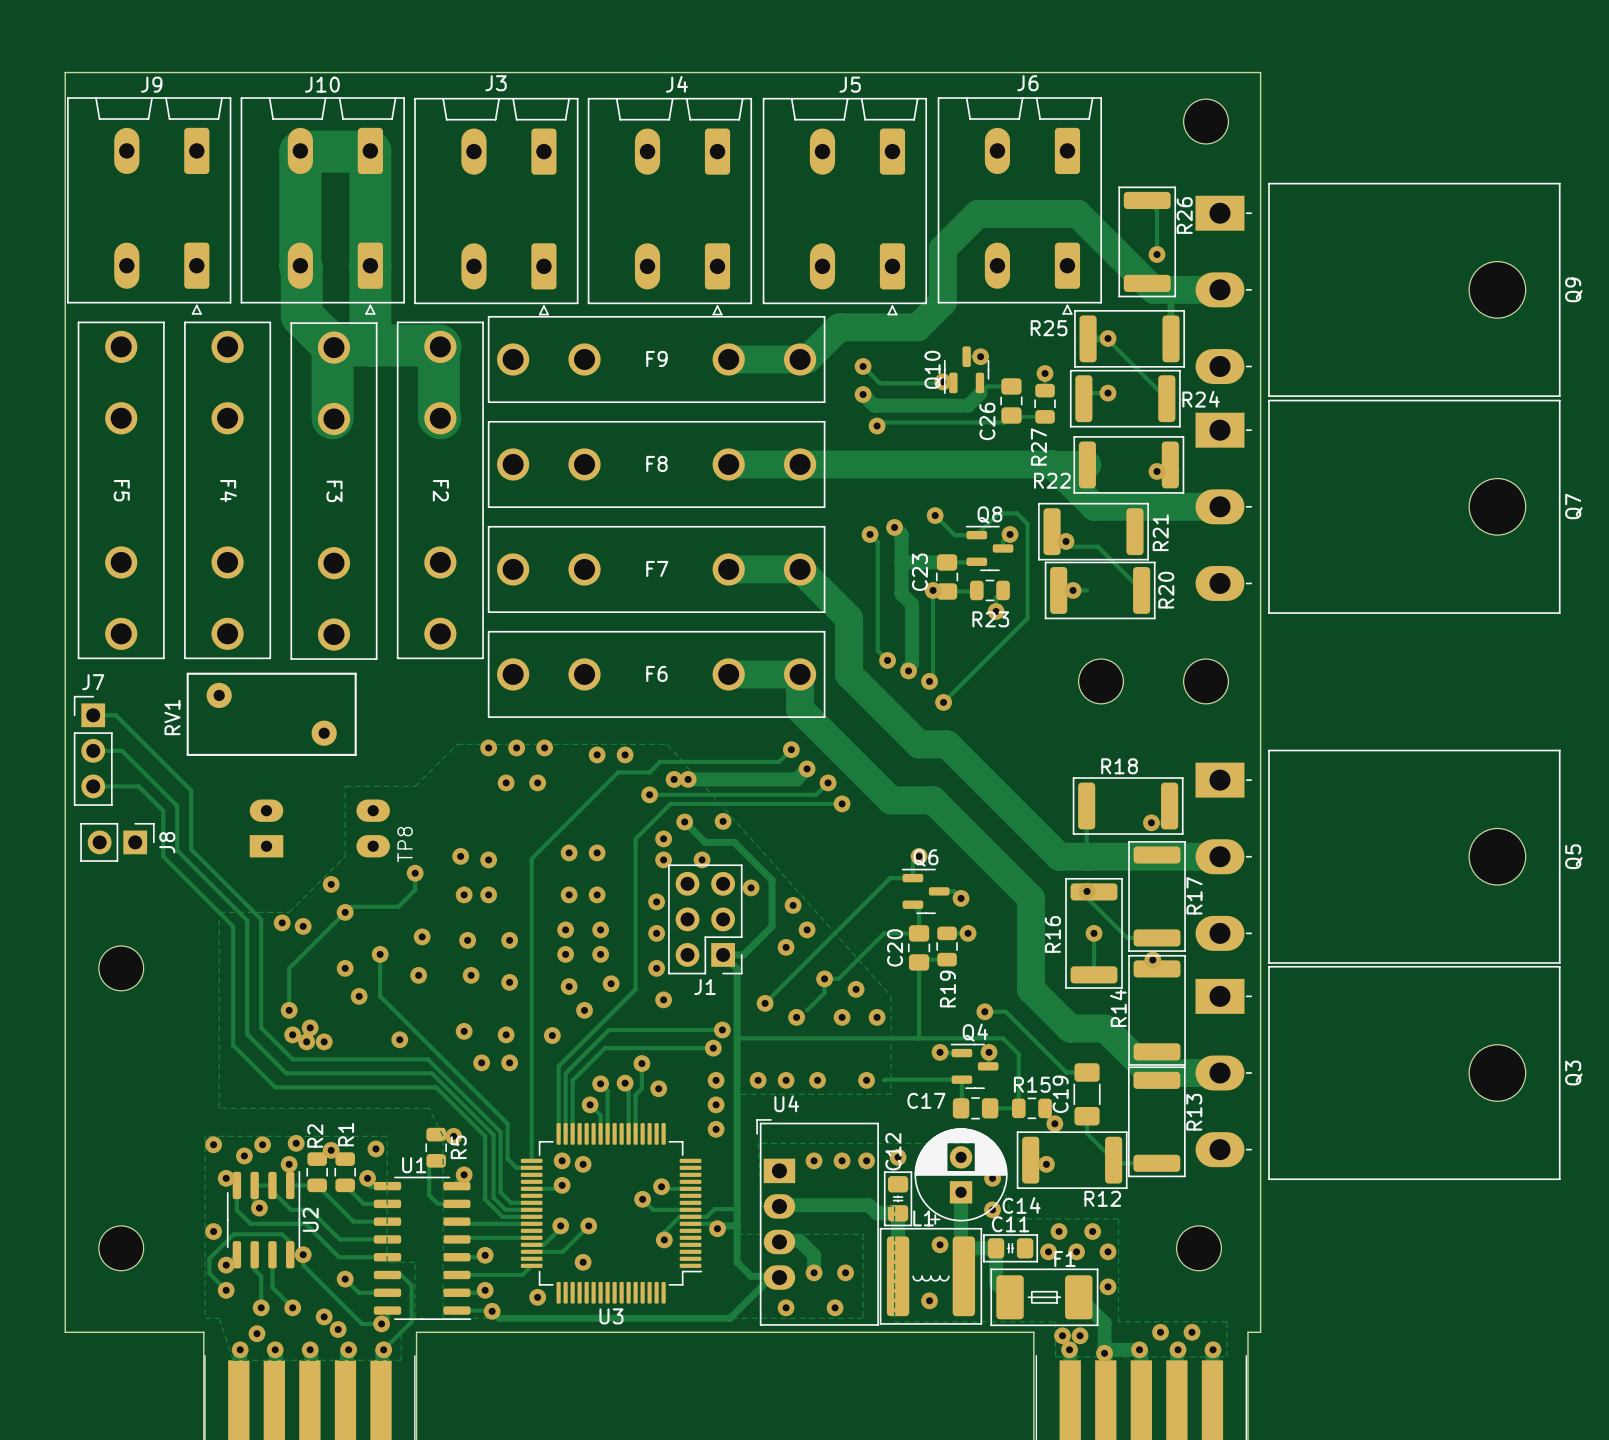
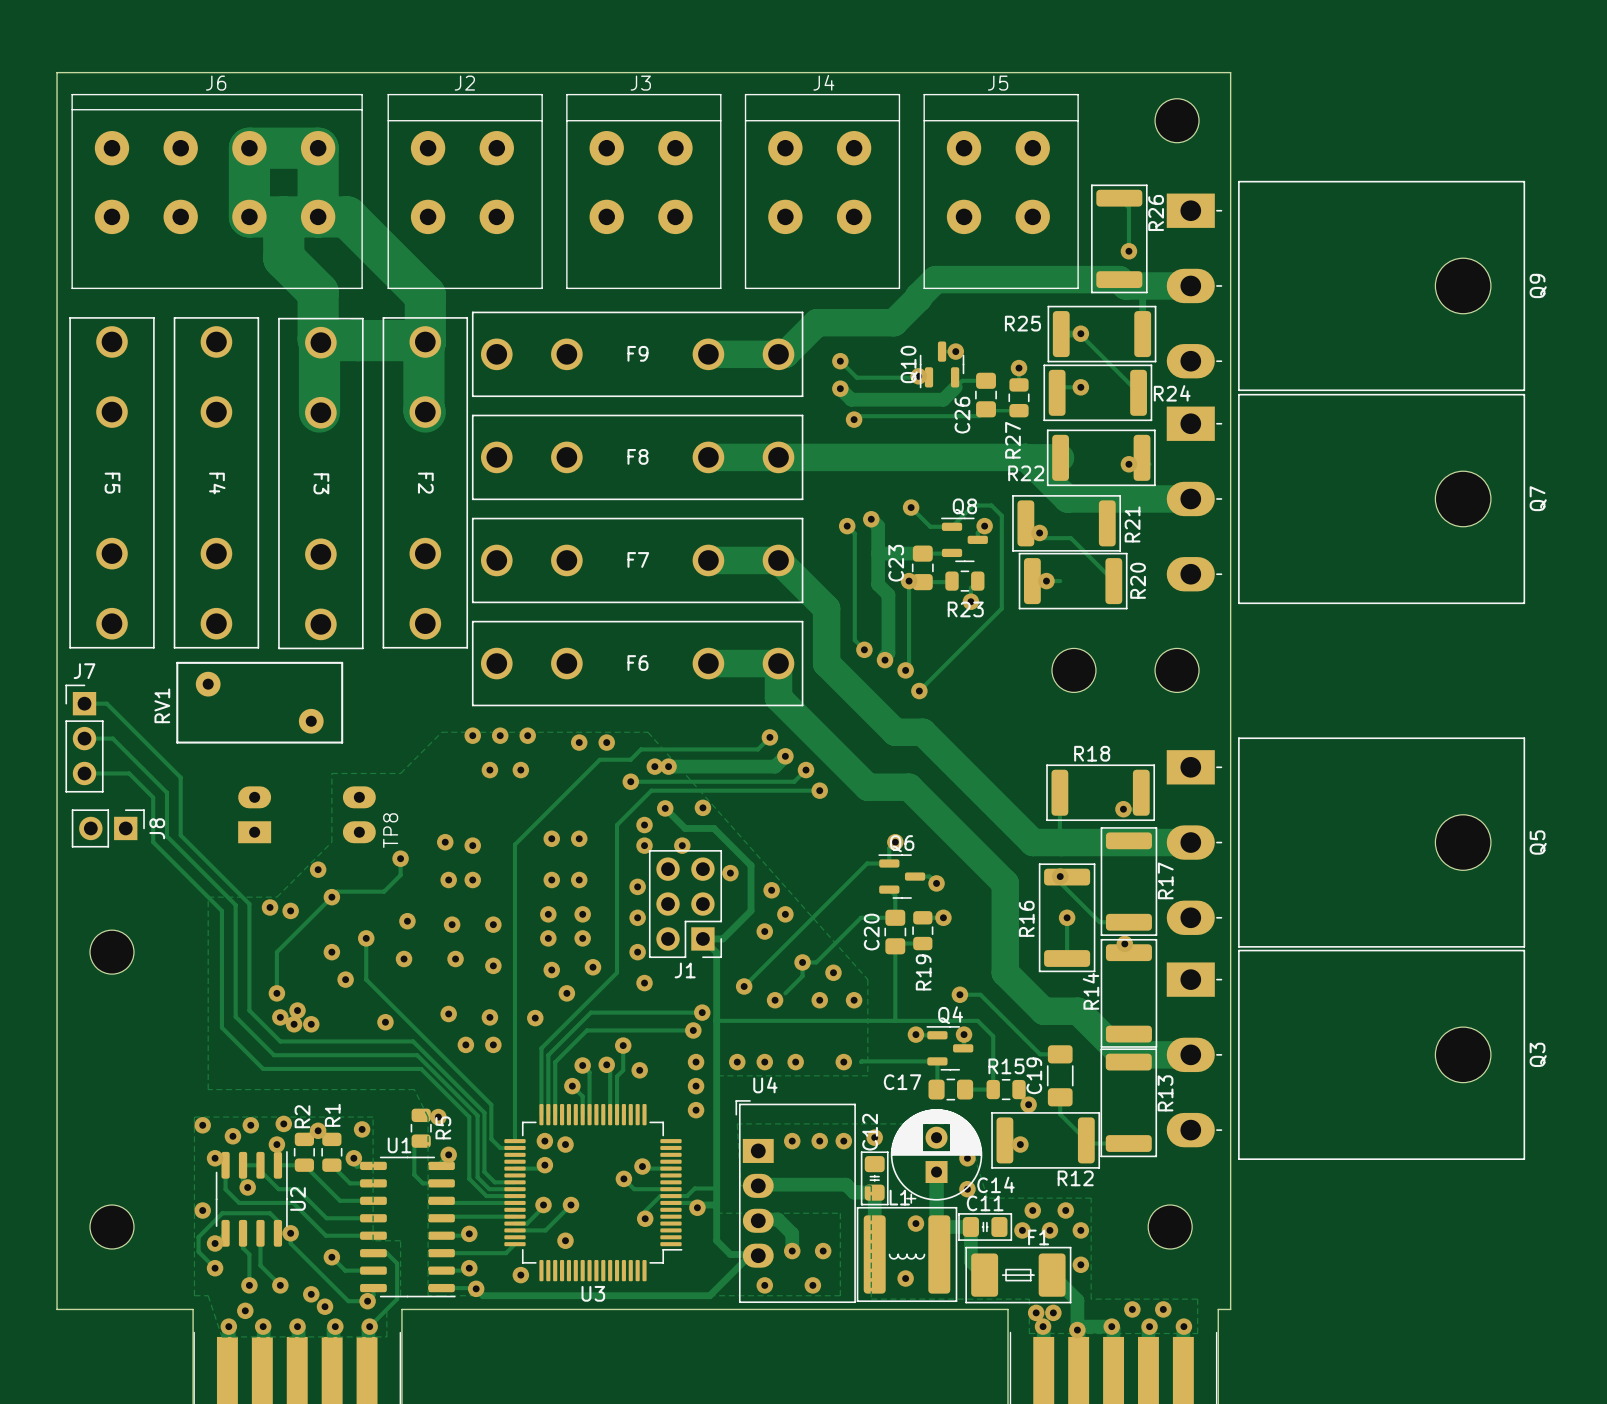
J3 footprint: [414, 97, 579, 316] -> [566, 93, 722, 290]
J4 footprint: [587, 97, 753, 316] -> [744, 93, 901, 290]
J5 footprint: [762, 97, 928, 316] -> [923, 93, 1079, 290]
J6 footprint: [937, 97, 1103, 315] -> [71, 93, 363, 290]
J2: none -> (465, 191)
J9: (149, 205) -> none
J10: (322, 205) -> none
track: none -> (283, 216) (283, 258) (318, 292) (319, 340)
track: none -> (318, 216) (318, 148) (249, 148) (249, 216) (346, 216) (425, 295) (425, 341)
track: (1147, 283) (1077, 213) (977, 213) (942, 248) (942, 300) -> (1119, 279) (935, 279) (918, 296)
track: (370, 344) (370, 151) (300, 151) (301, 315) (333, 347) -> none

